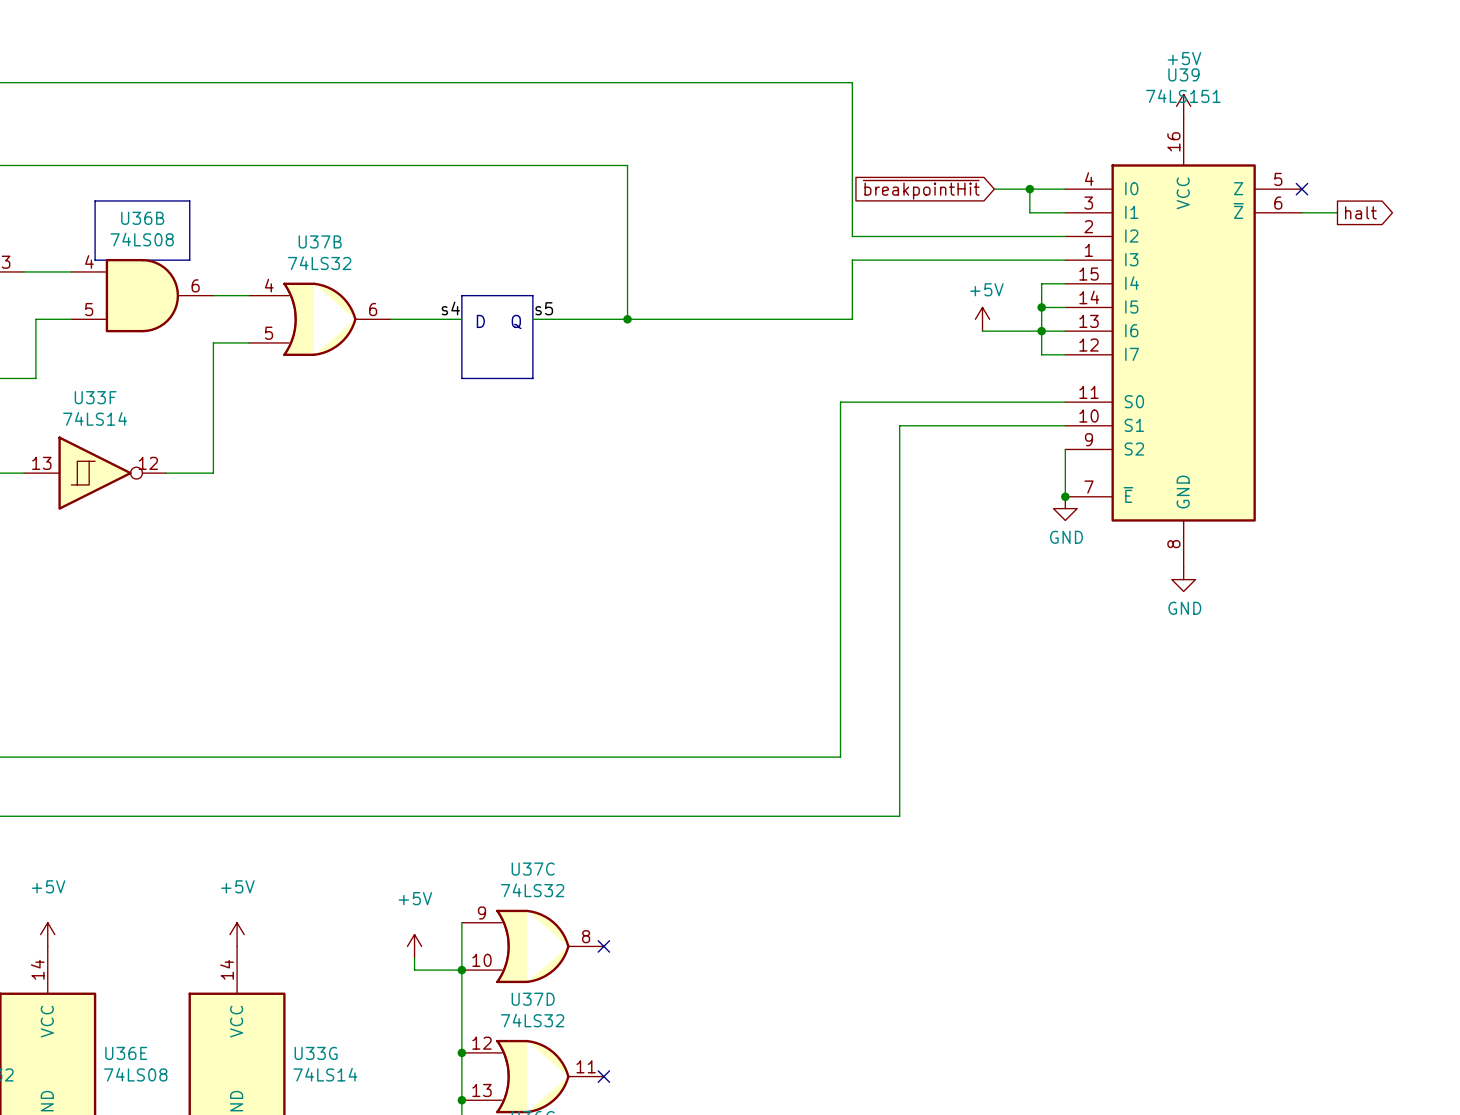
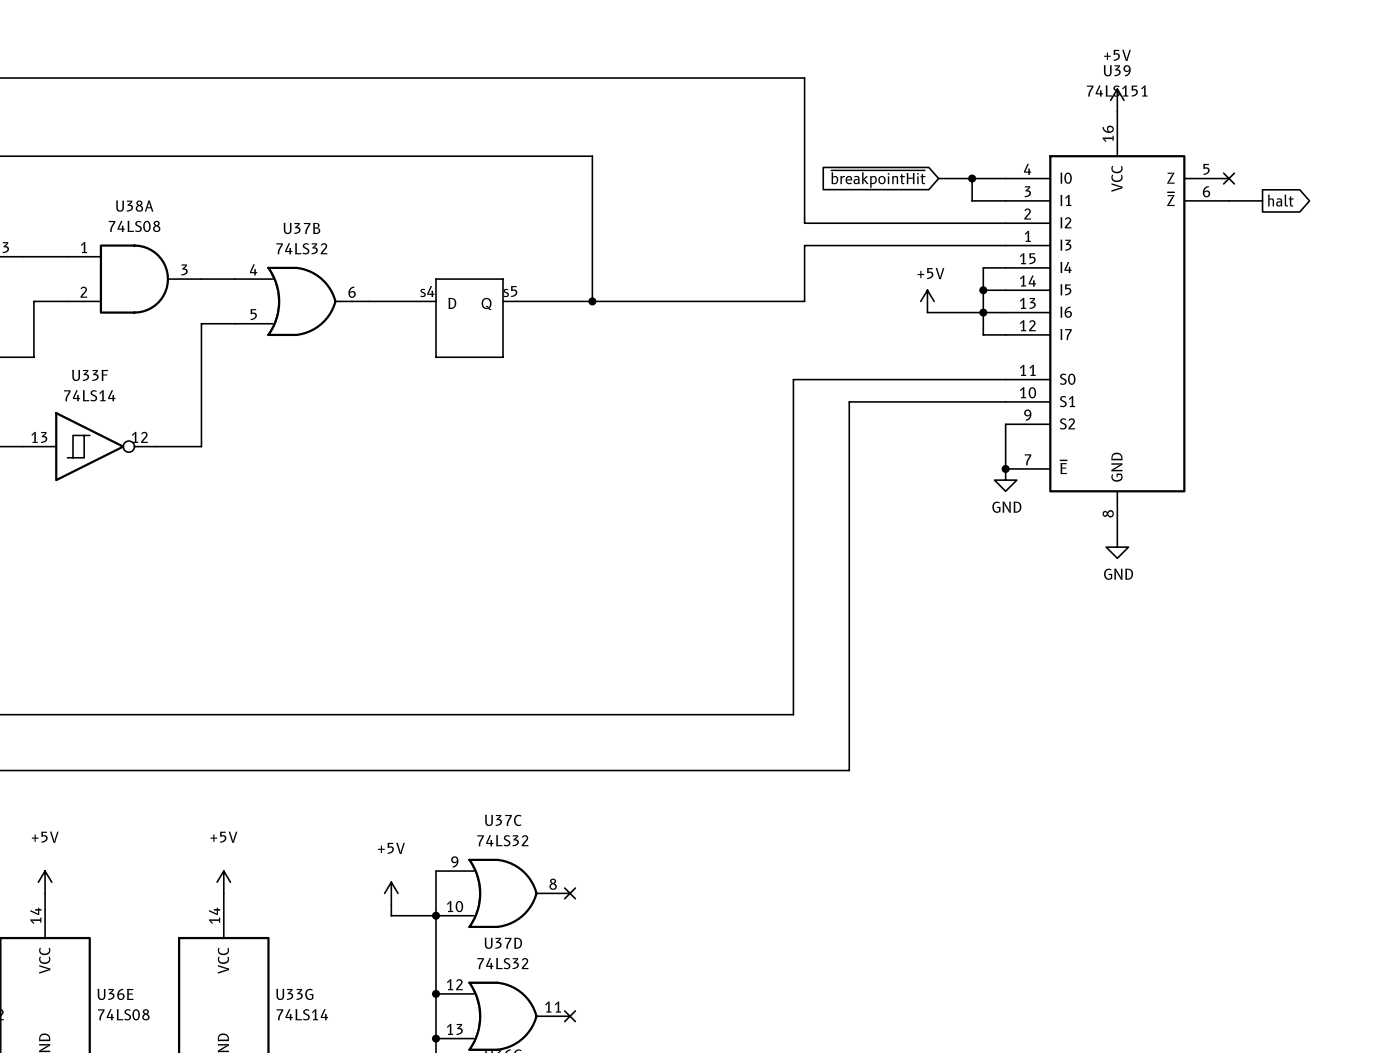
line: (95, 200) (95, 260) (189, 260) (189, 200) (95, 200) -> none
U36B name: U36B (142, 218) -> U38A (134, 206)
U36B pin number: 4 (89, 261) -> 1 (83, 247)
U36B pin number: 6 (195, 285) -> 3 (184, 269)
U36B pin number: 5 (89, 309) -> 2 (83, 292)

